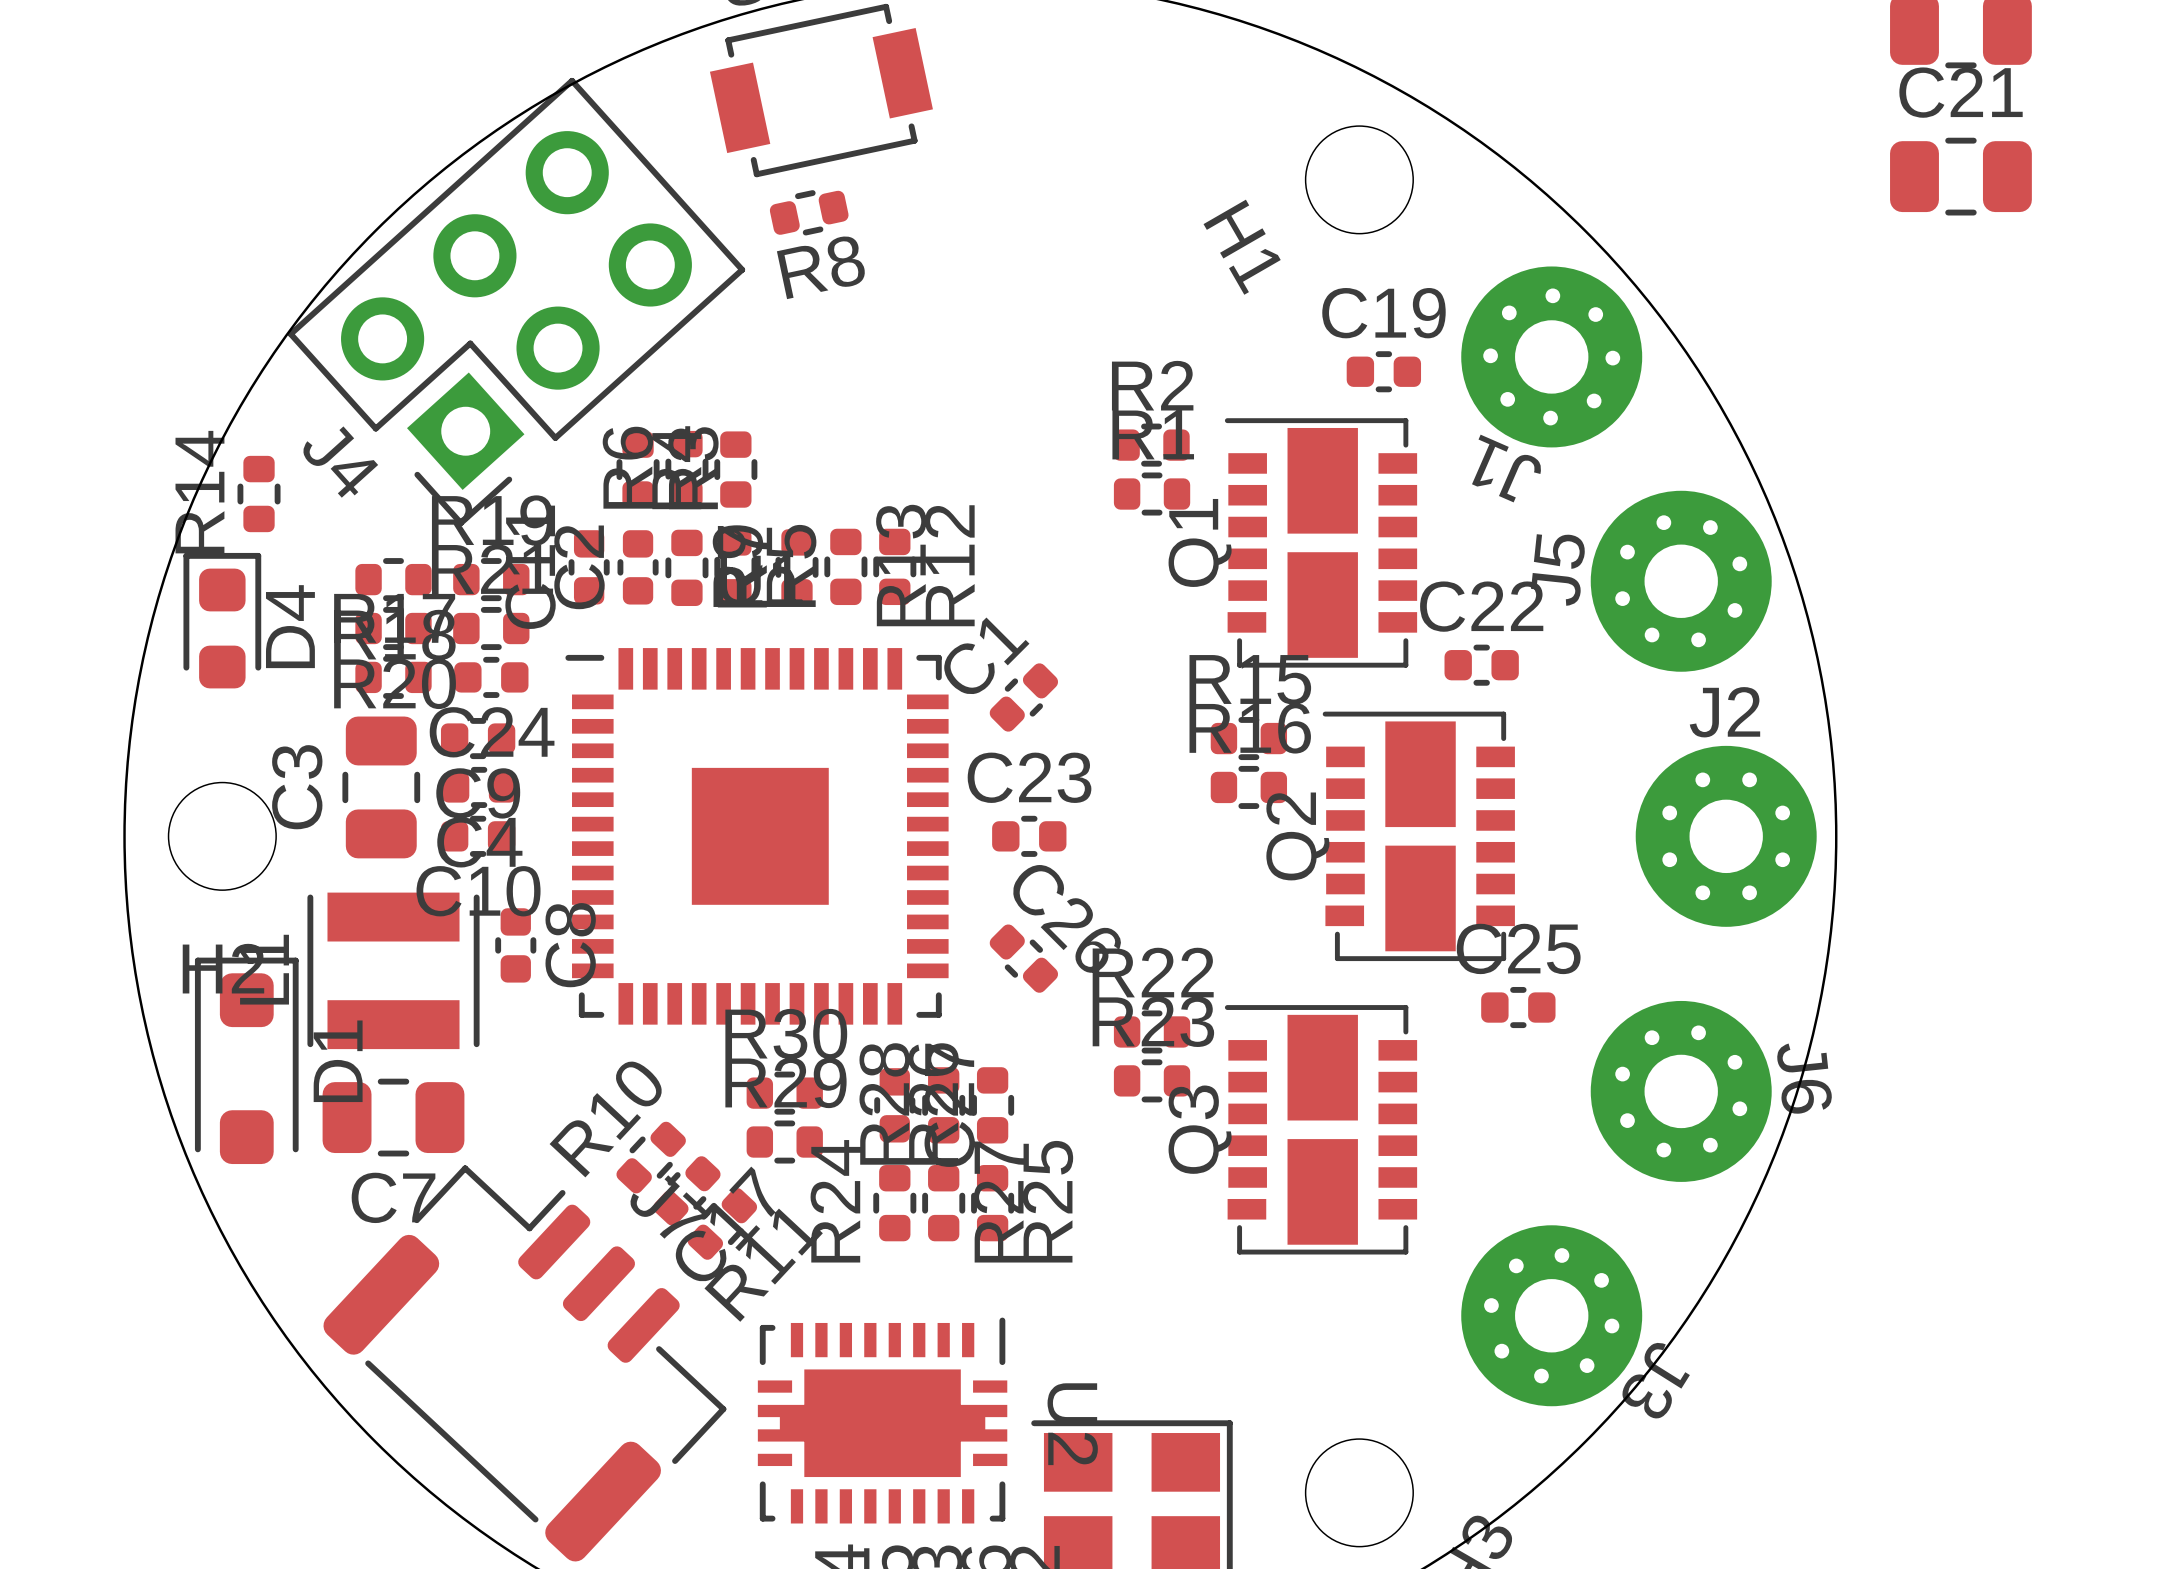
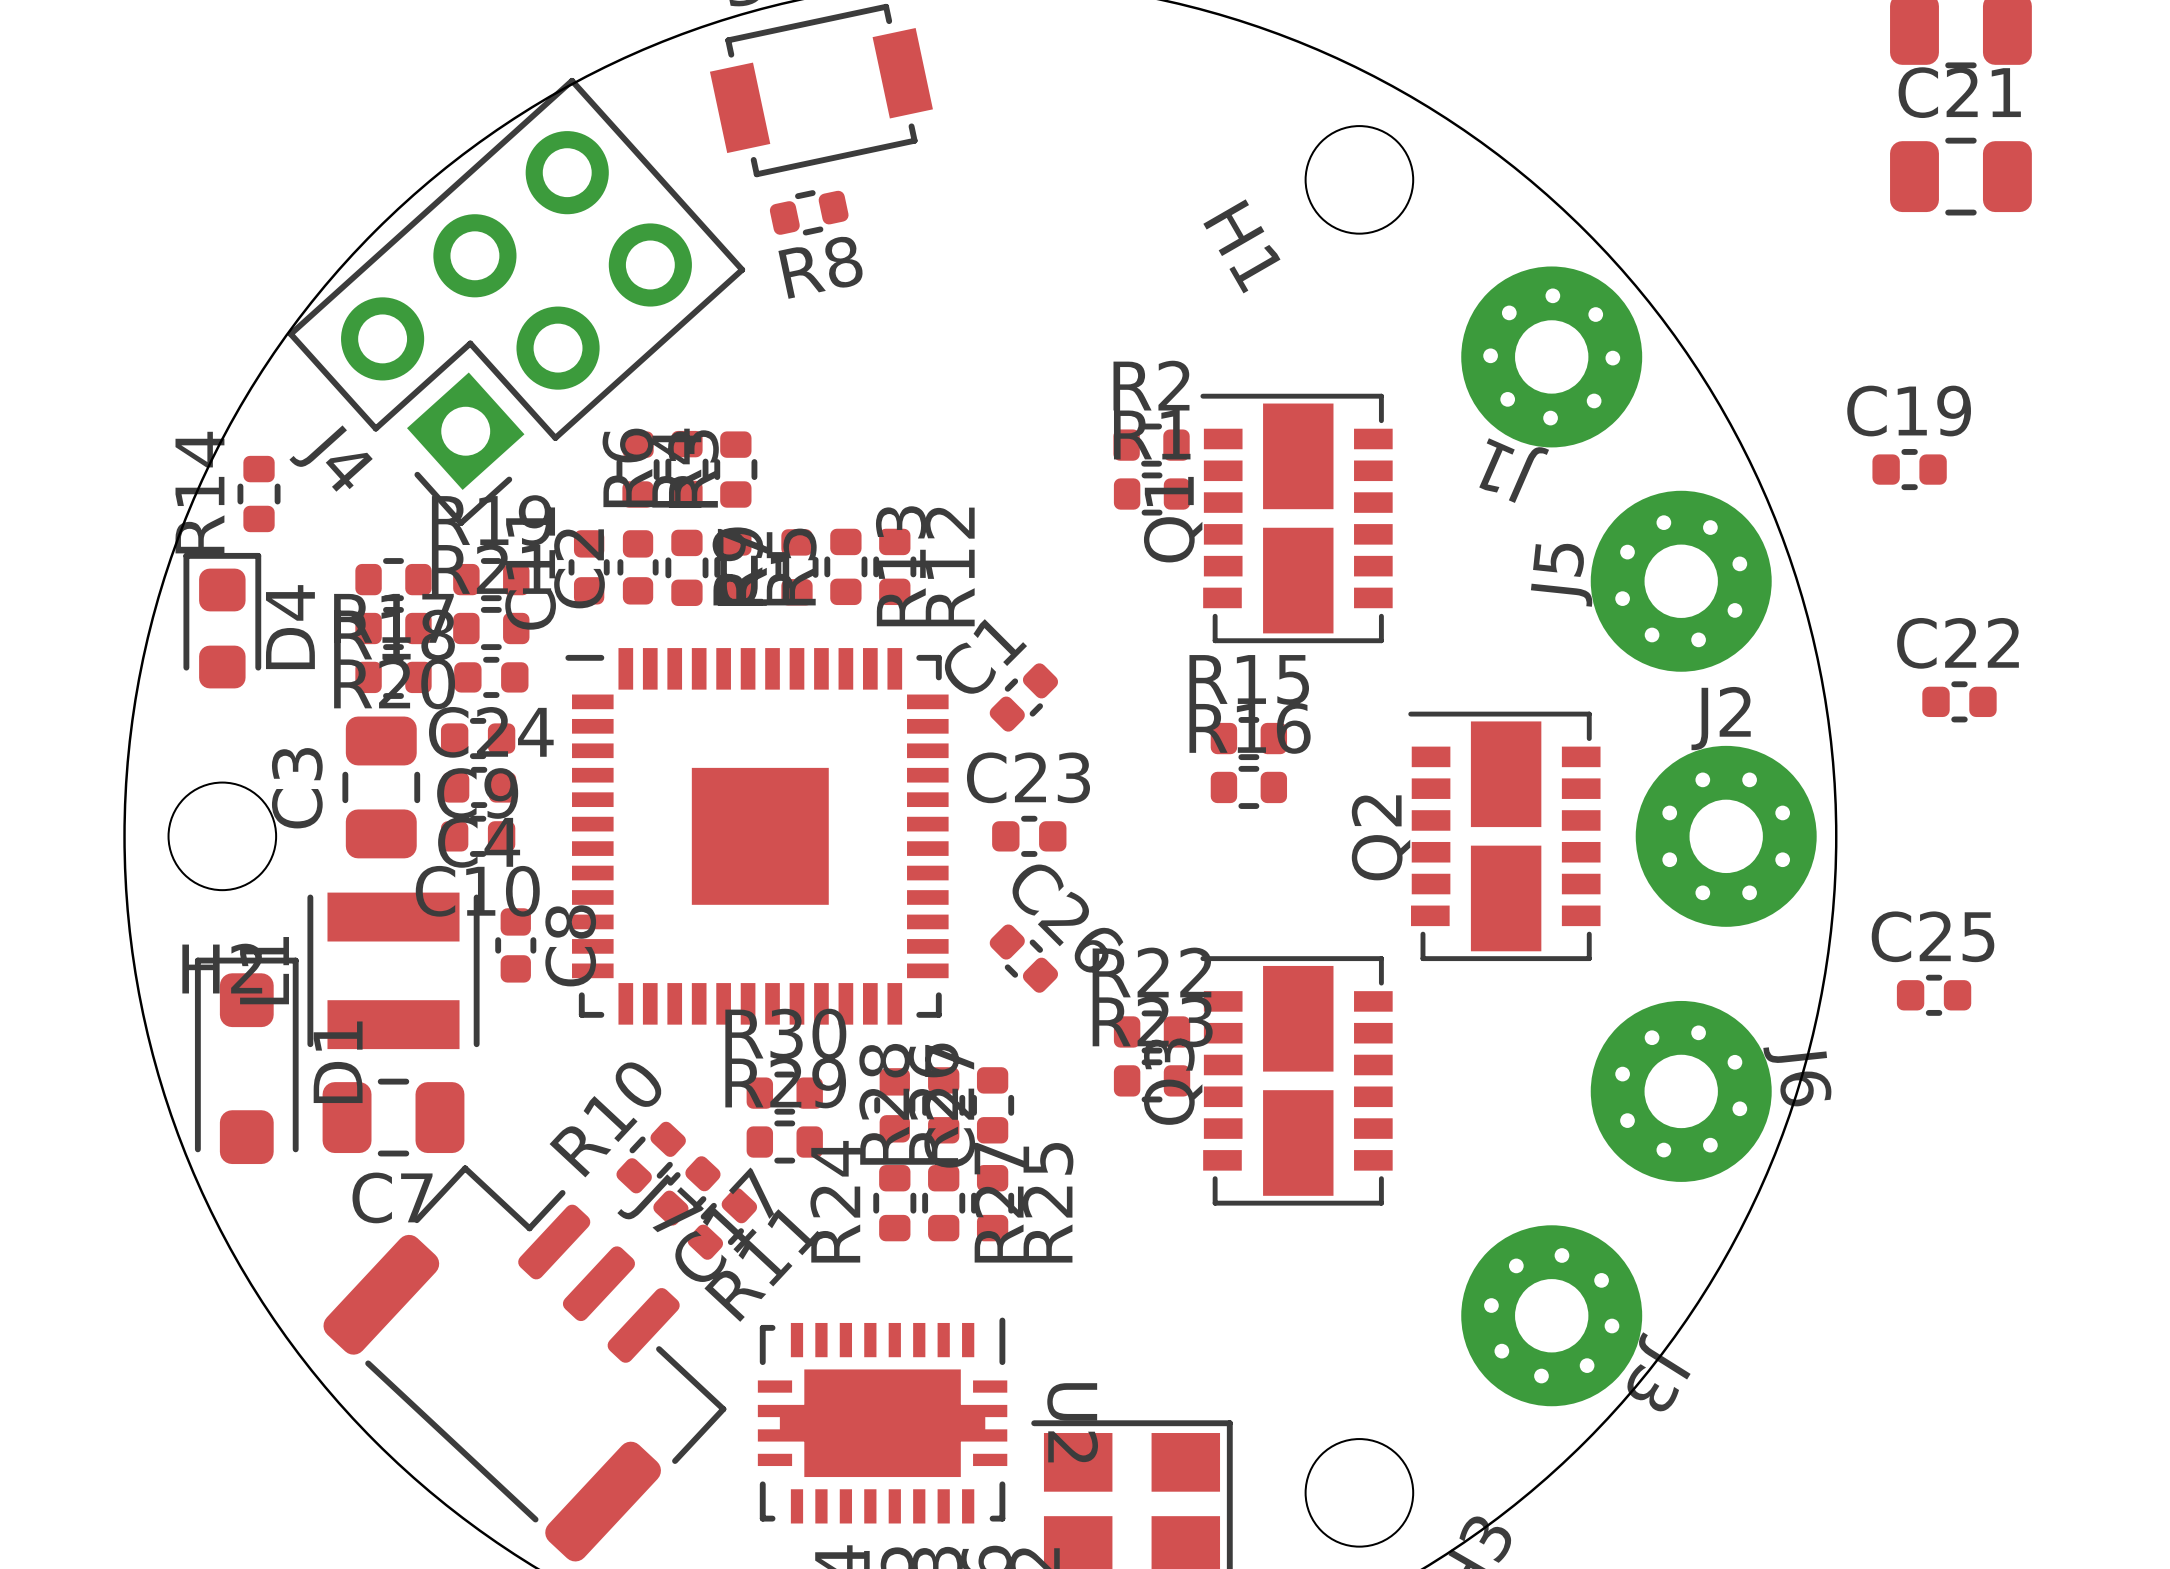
C19 position: (1383, 371) -> (1909, 469)
Q1 position: (1321, 542) -> (1296, 518)
C22 position: (1481, 665) -> (1959, 701)
Q2 position: (1418, 836) -> (1504, 836)
C25 position: (1518, 1007) -> (1934, 995)
Q3 position: (1321, 1129) -> (1296, 1080)

